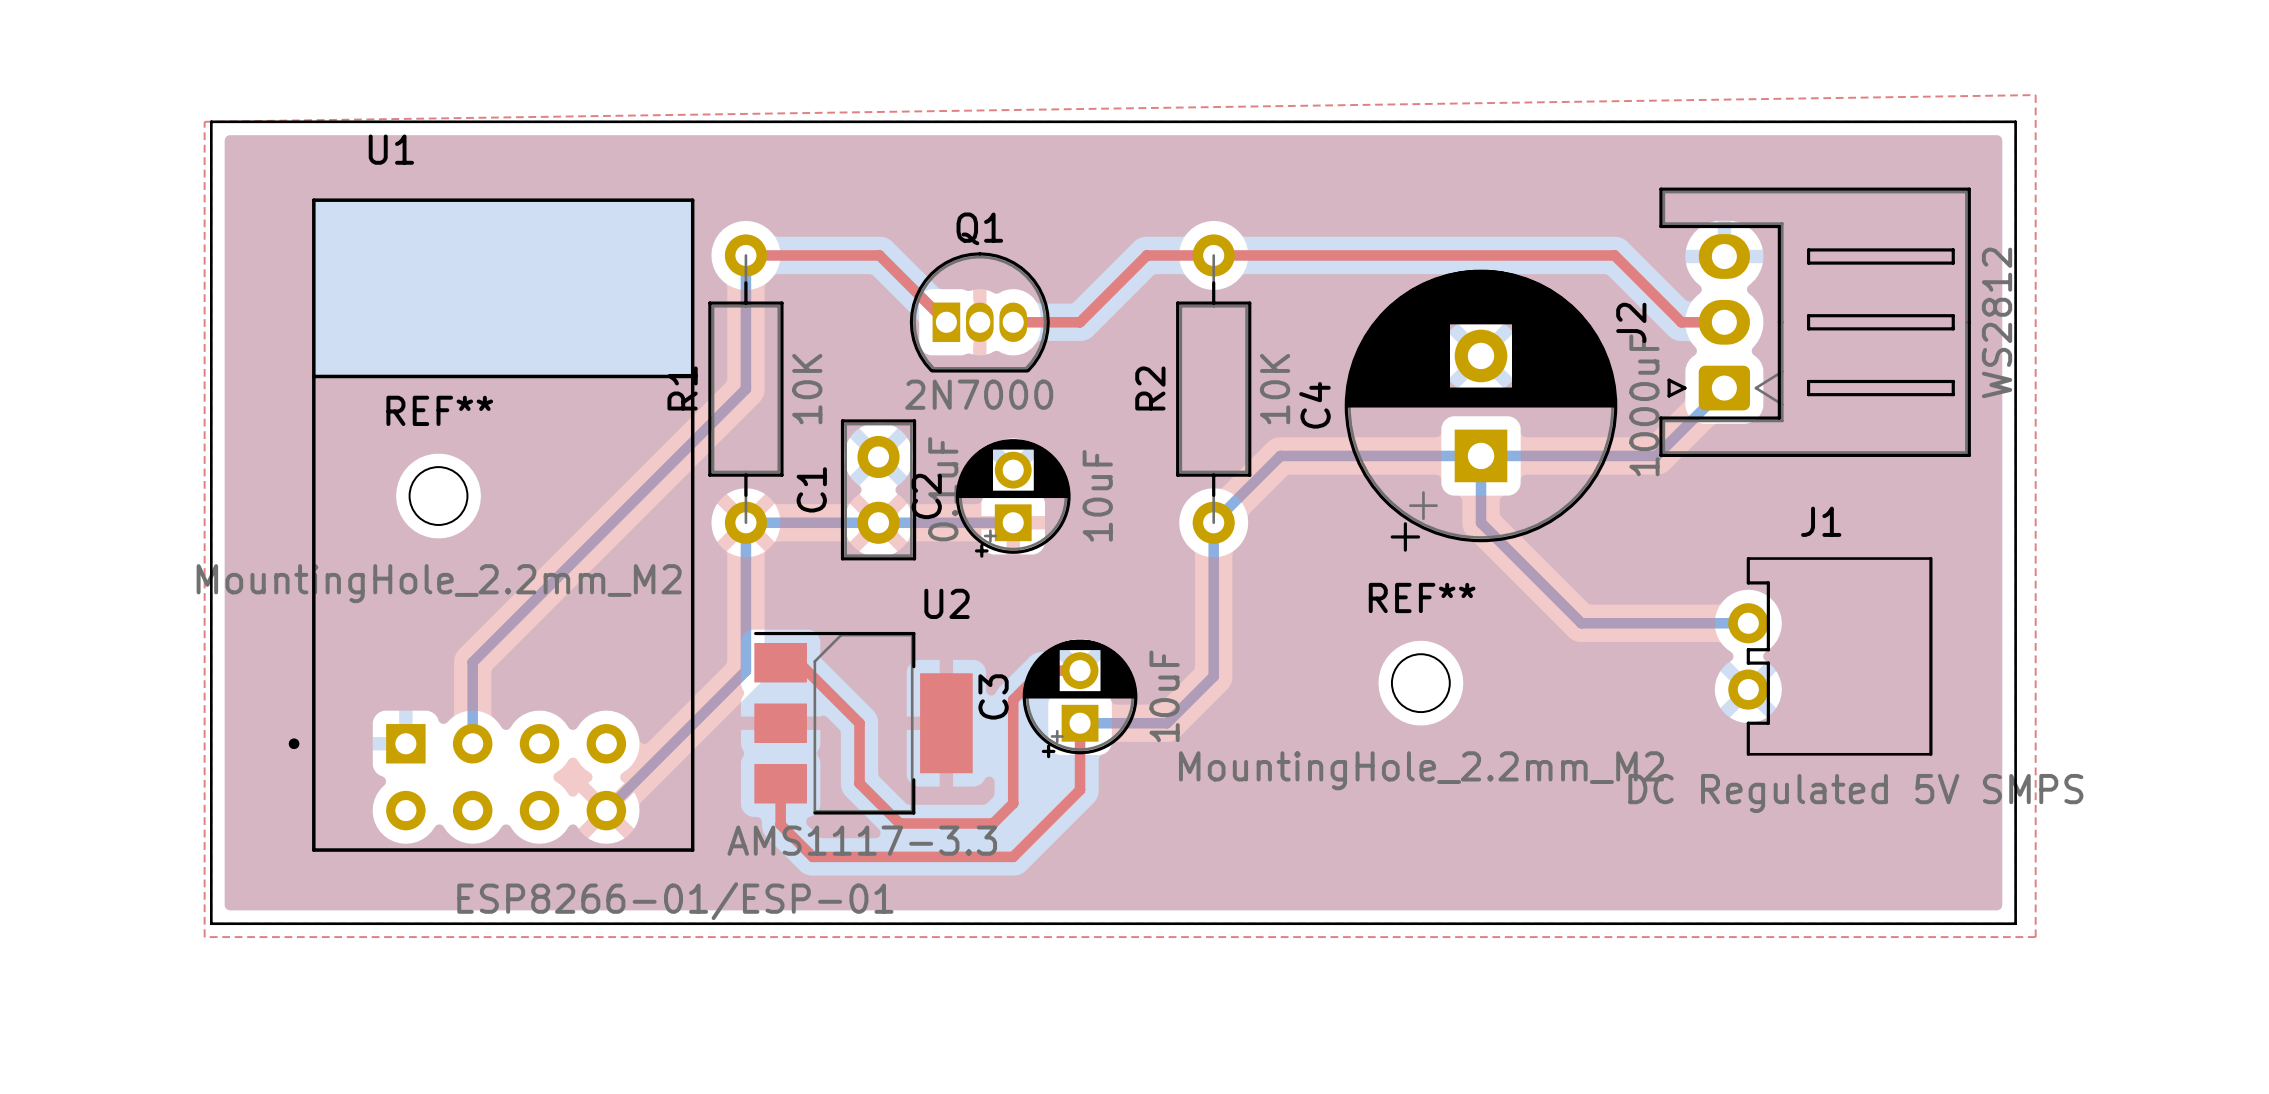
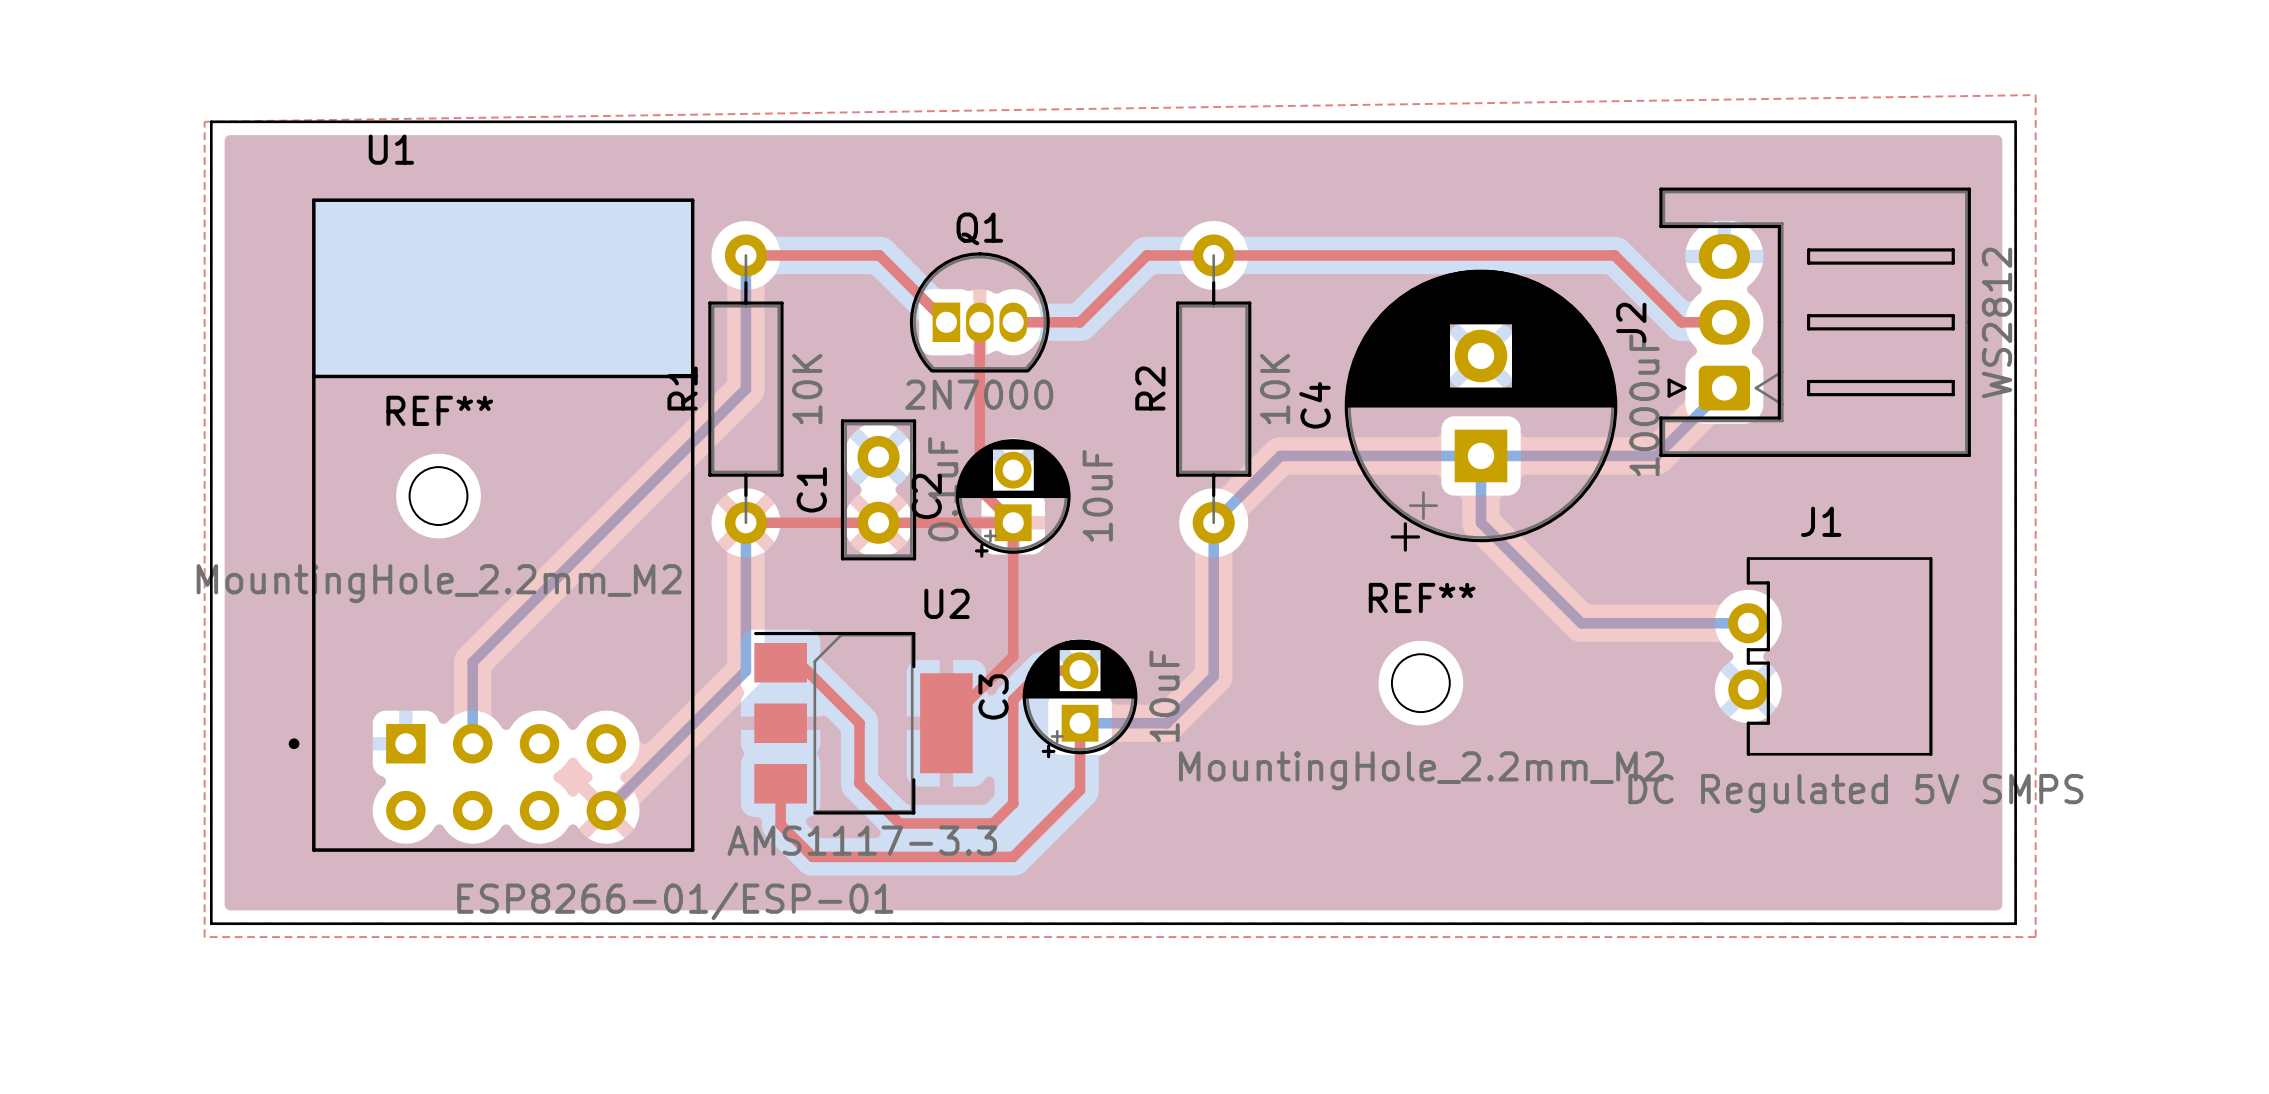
top track: none -> (979, 322) (979, 489) (1013, 522)
bottom track: (745, 522) (1013, 522) -> none
top track: none -> (745, 522) (1013, 522)
top track: none -> (1013, 522) (1013, 656) (946, 723)

